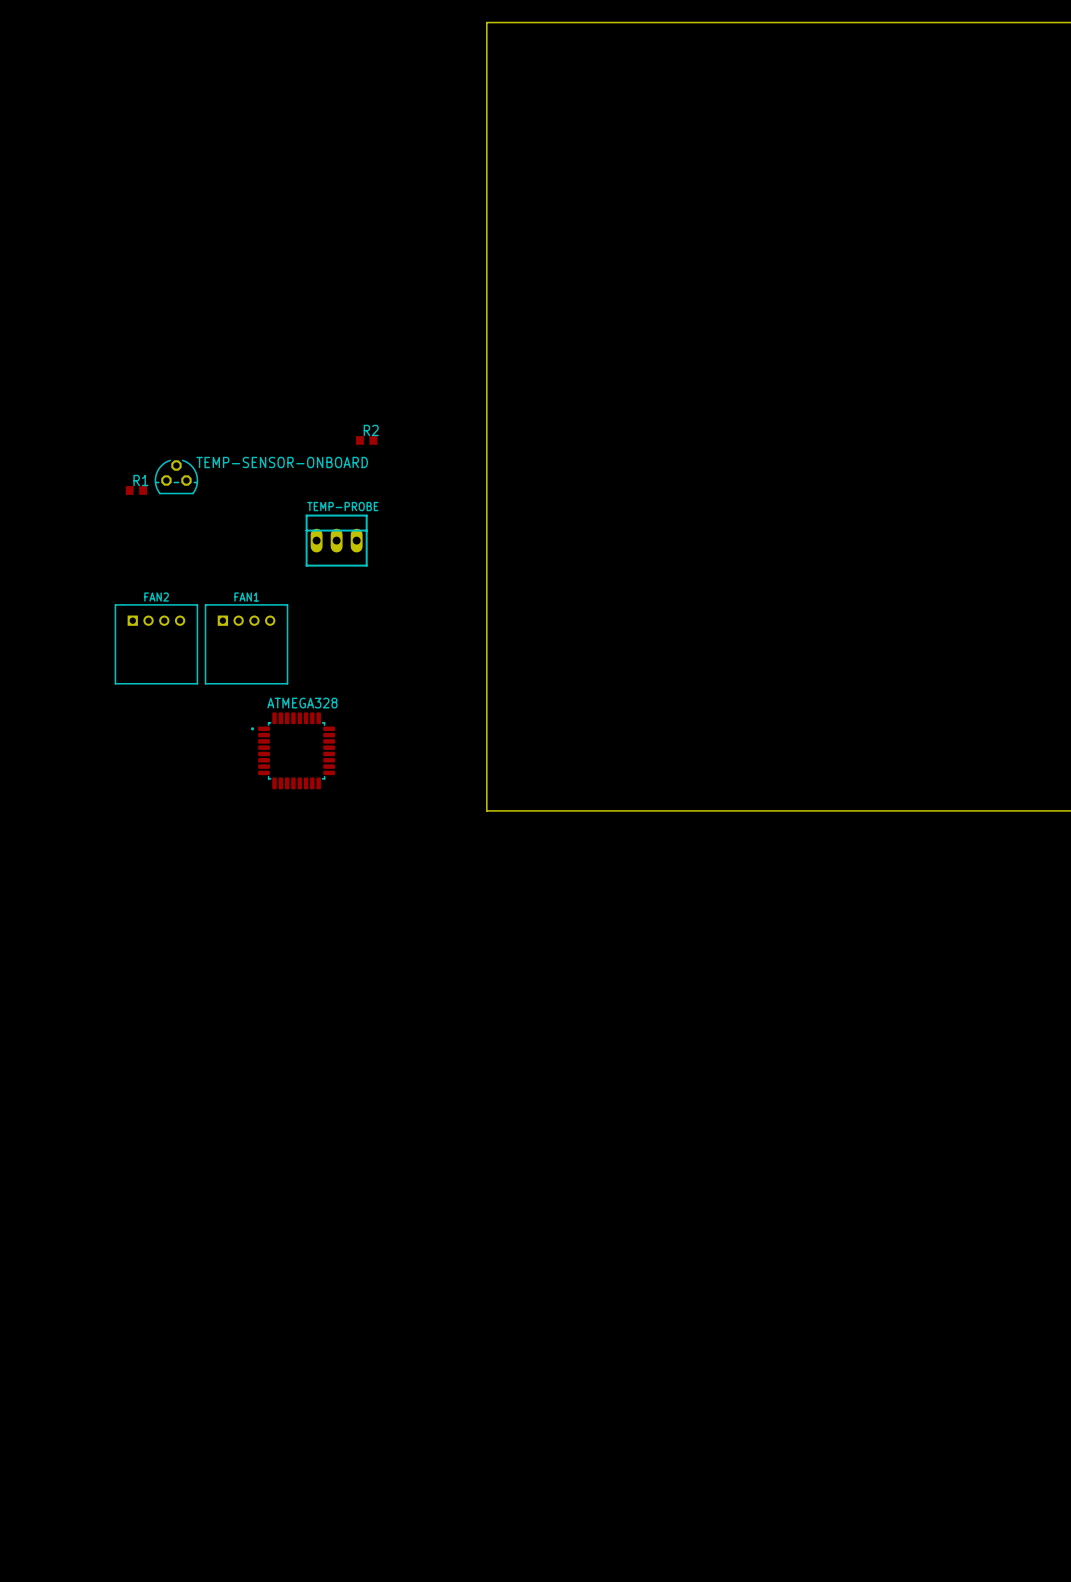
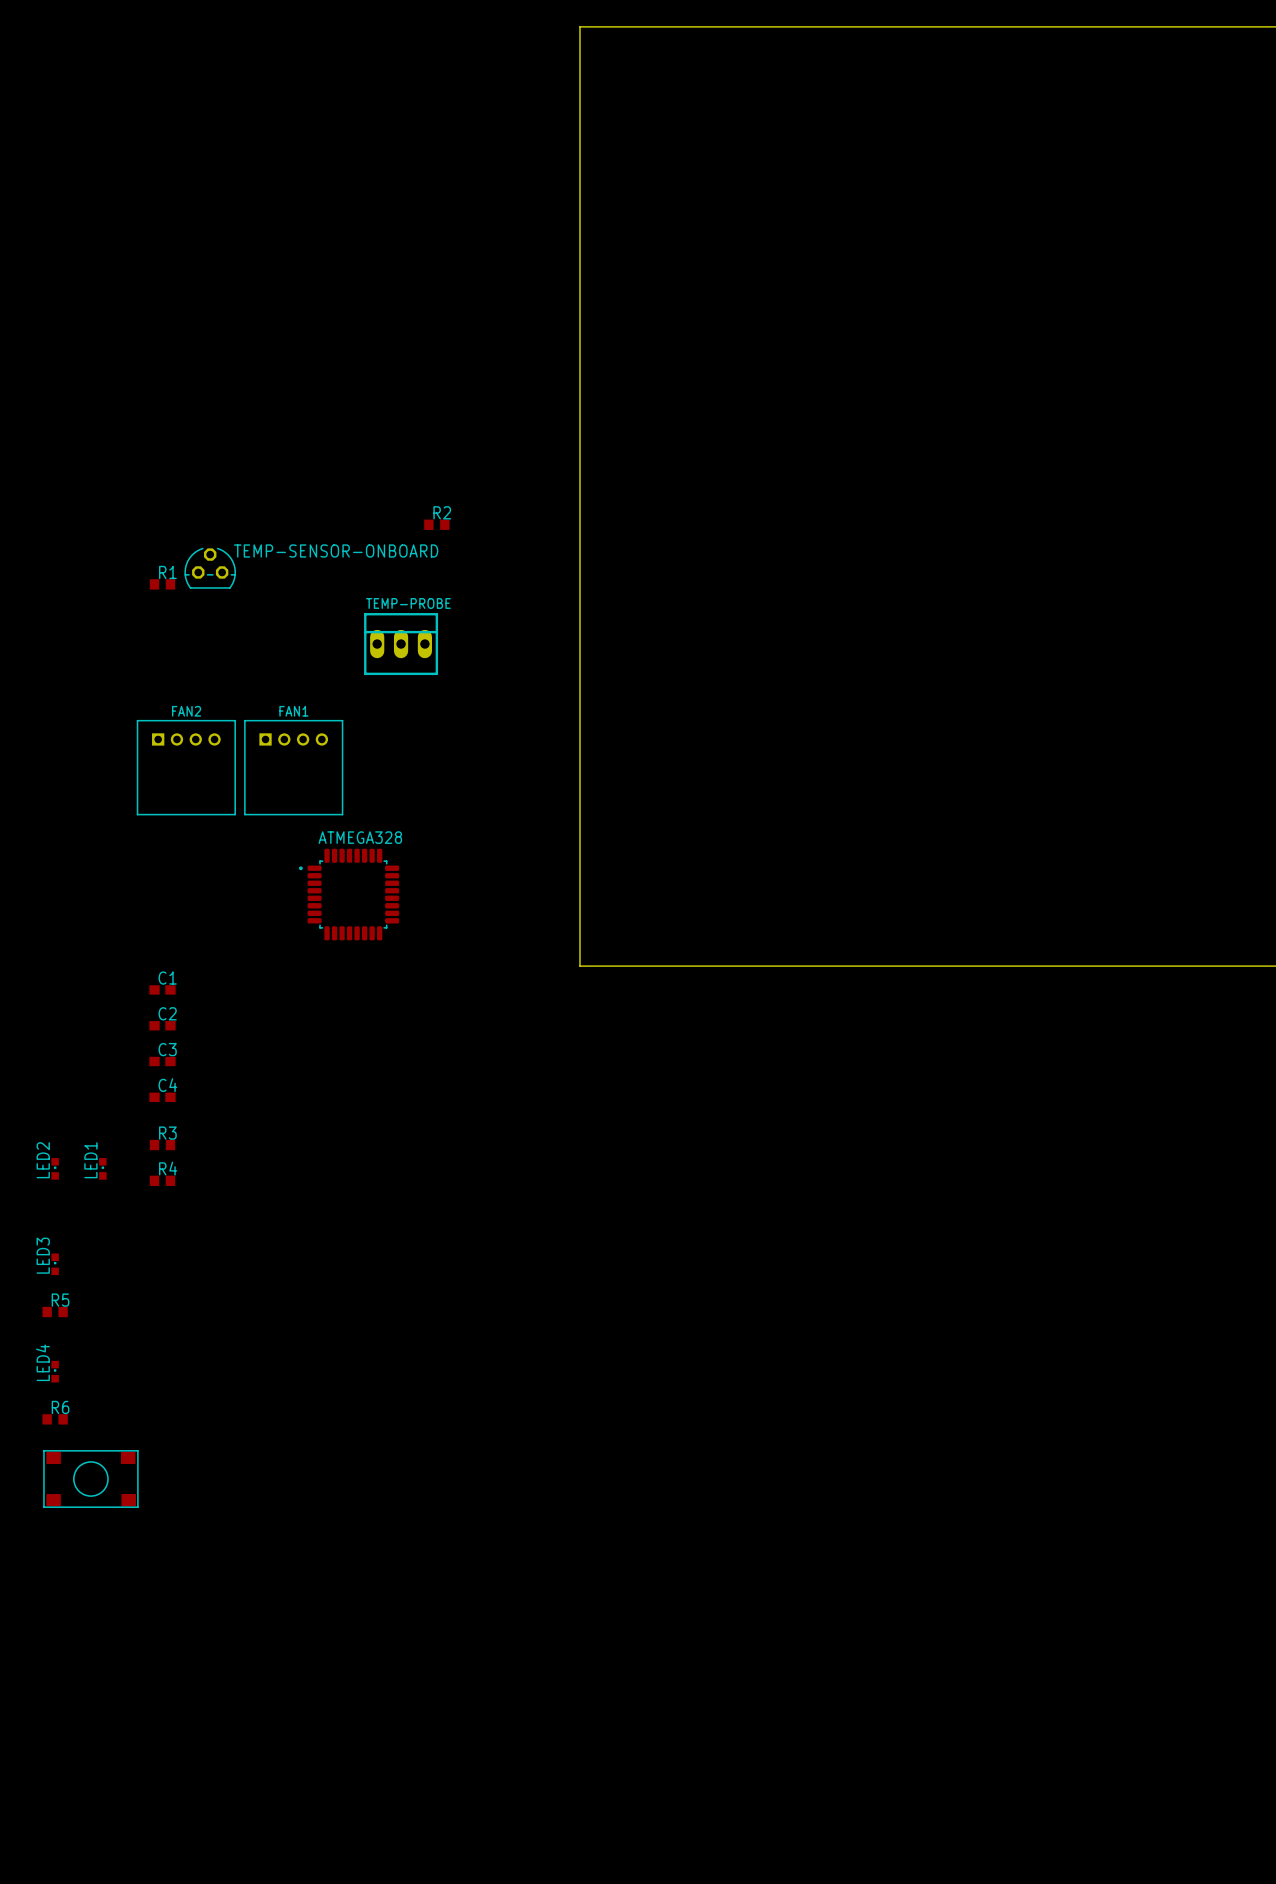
C1: none -> (162, 989)
C2: none -> (162, 1025)
C3: none -> (162, 1061)
C4: none -> (162, 1097)
R3: none -> (162, 1145)
LED2: none -> (55, 1168)
LED1: none -> (102, 1168)
R4: none -> (162, 1180)
LED3: none -> (55, 1264)
R5: none -> (55, 1312)
LED4: none -> (55, 1371)
R6: none -> (55, 1419)
part: none -> (90, 1479)

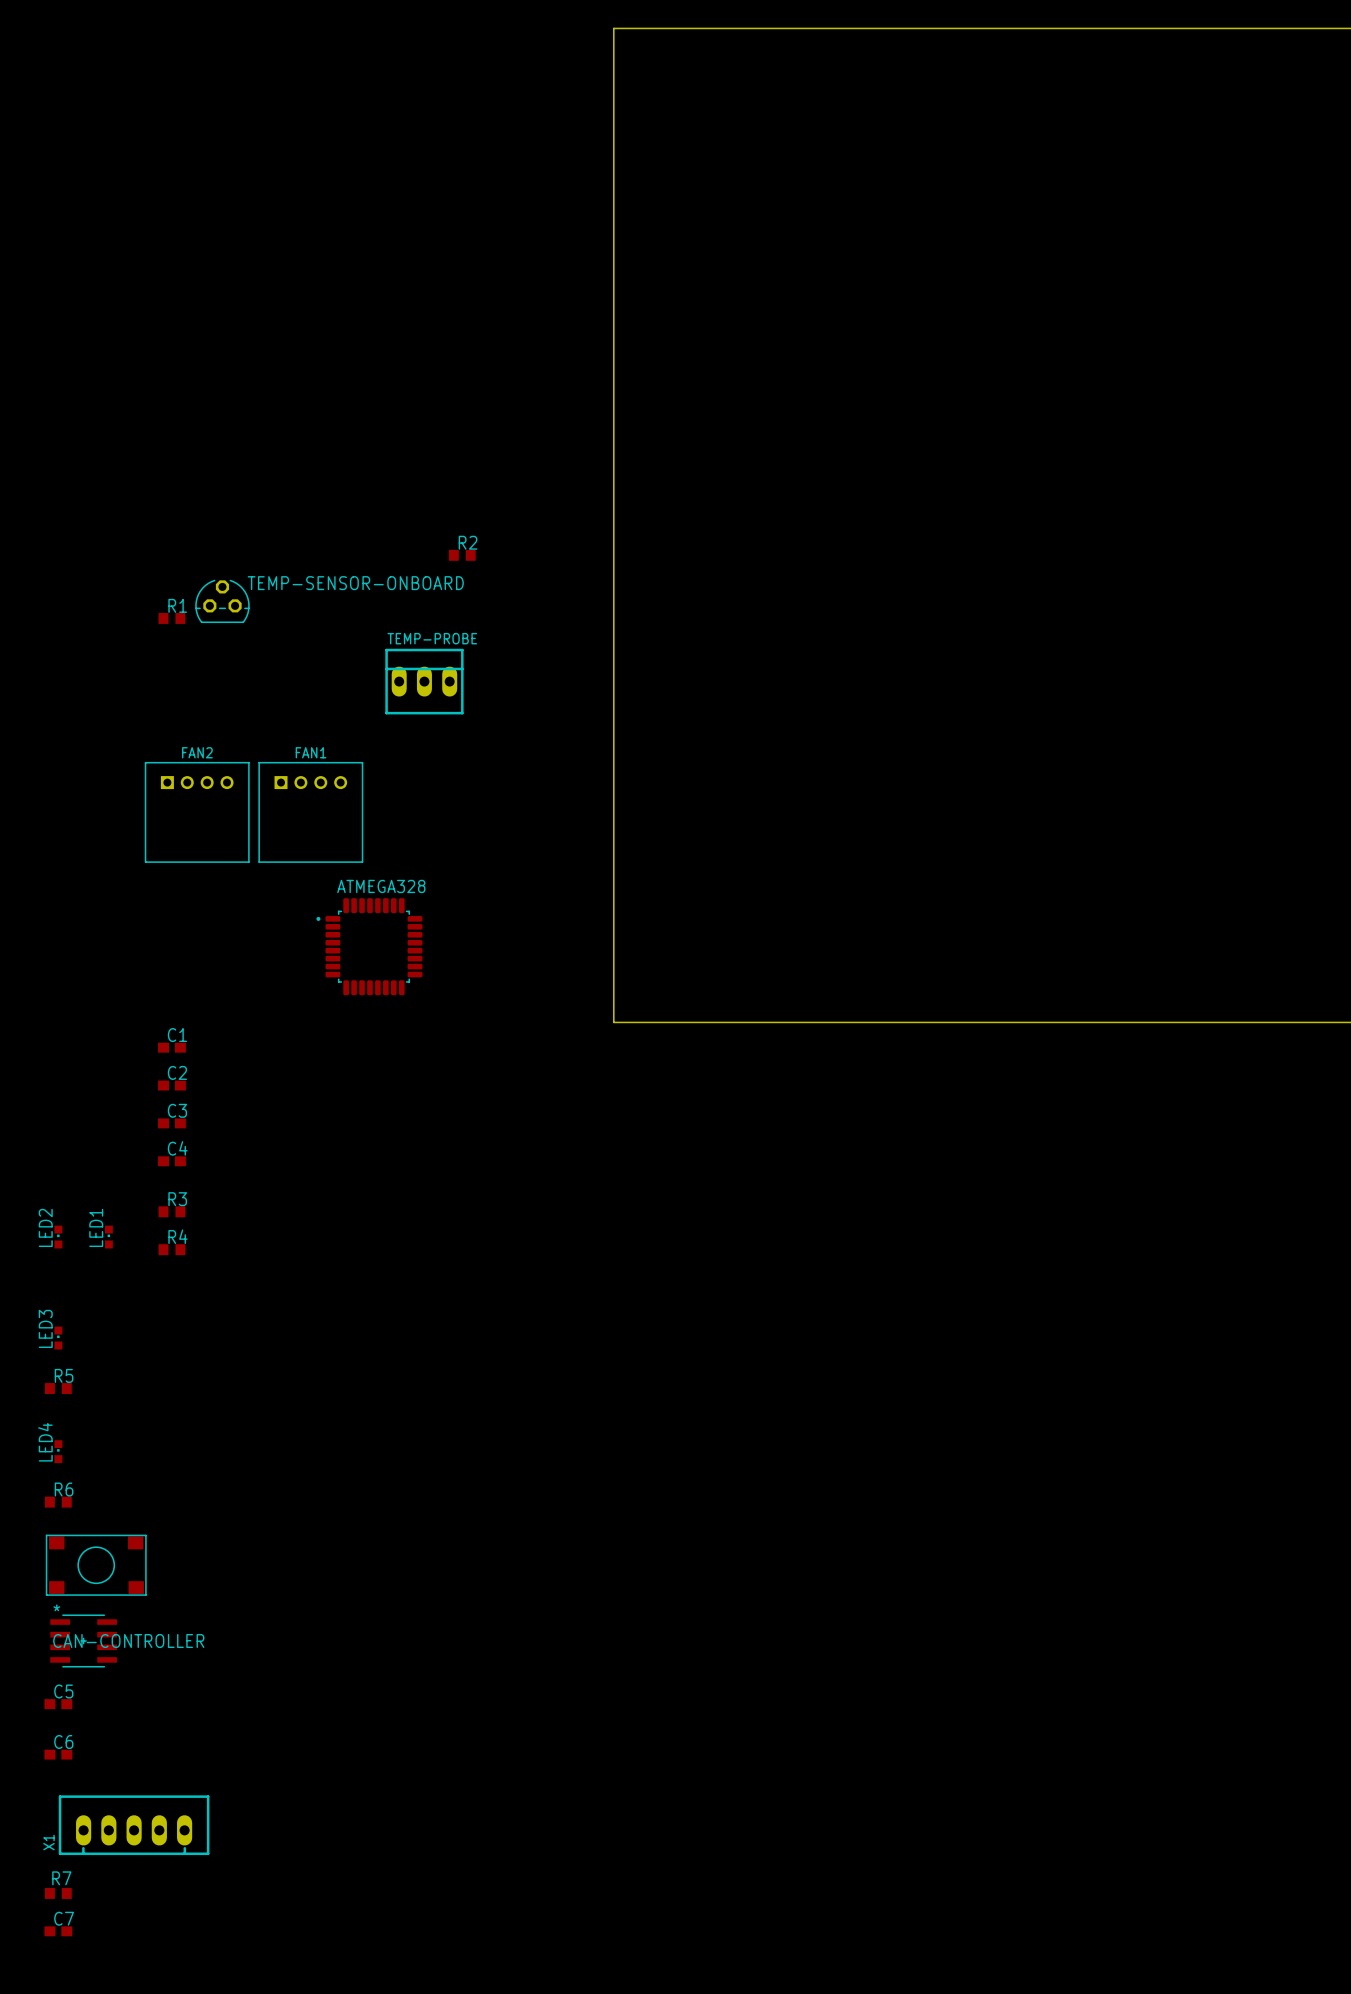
CAN-CONTROLLER: none -> (83, 1640)
C5: none -> (58, 1704)
C6: none -> (58, 1754)
X1: none -> (134, 1825)
R7: none -> (58, 1893)
C7: none -> (58, 1931)

